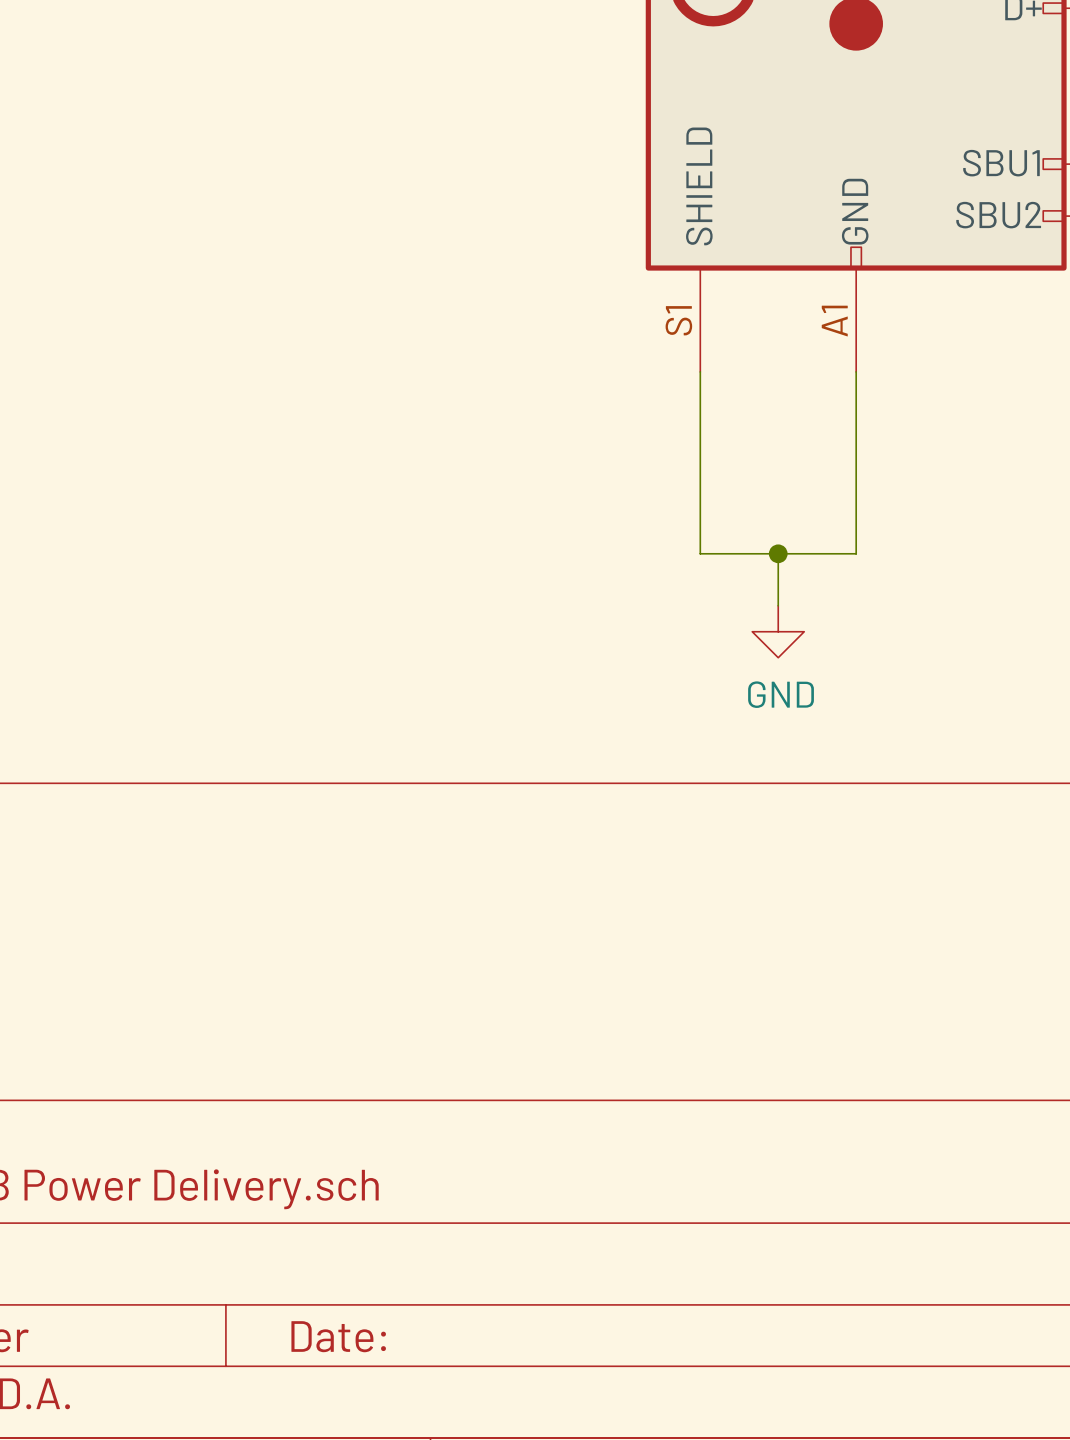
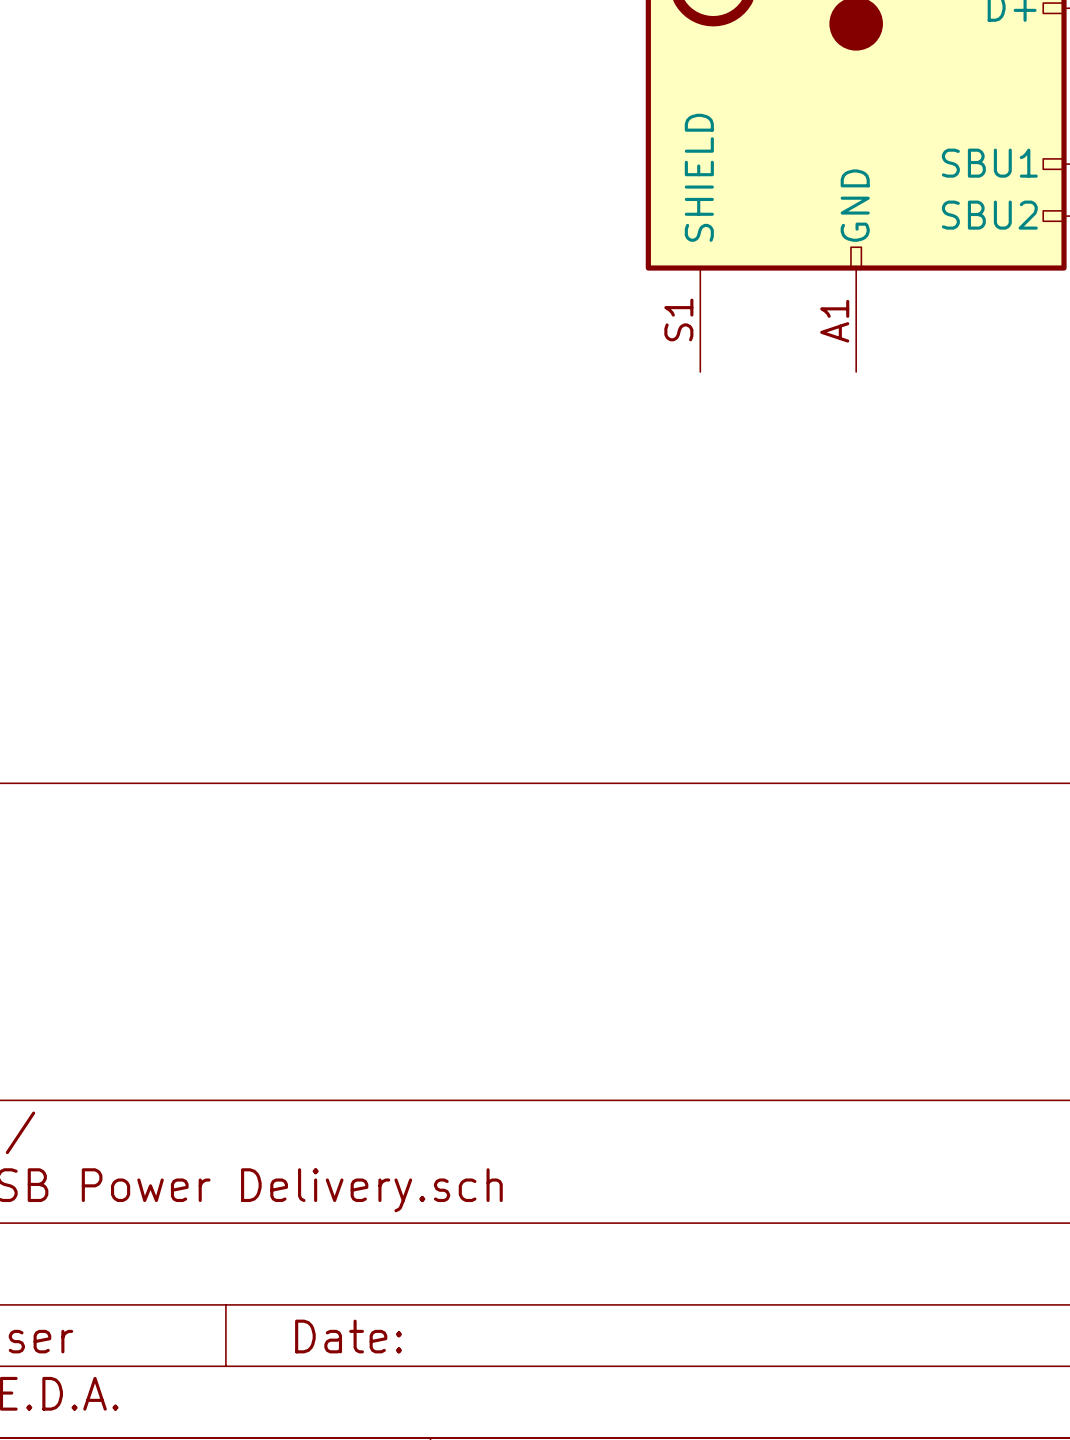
wire: (700, 371) (700, 553) (856, 553) (856, 371) -> none
wire: (778, 553) (778, 605) -> none
junction: (778, 553) -> none
power symbol: GND (778, 631) -> none

